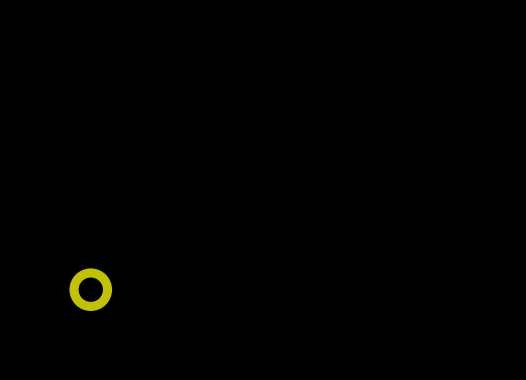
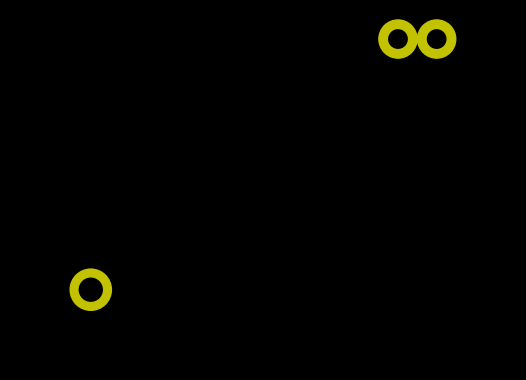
part: none -> (417, 39)

